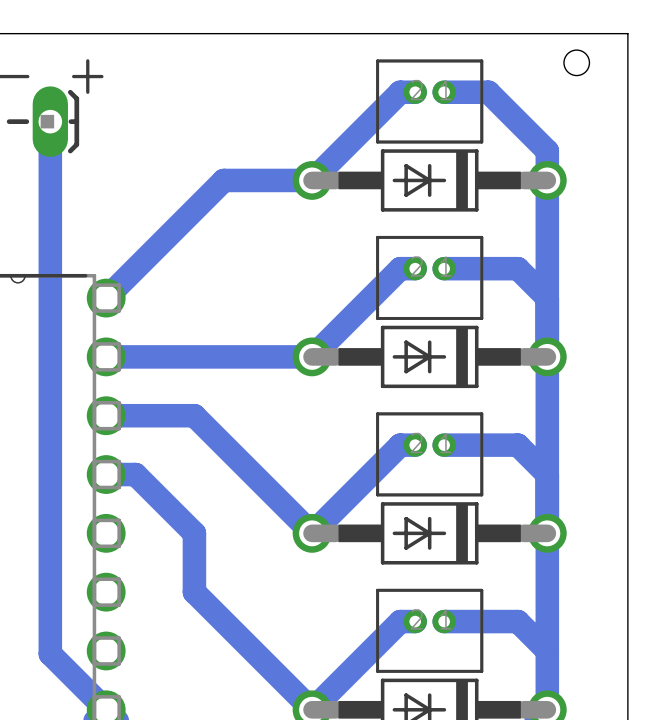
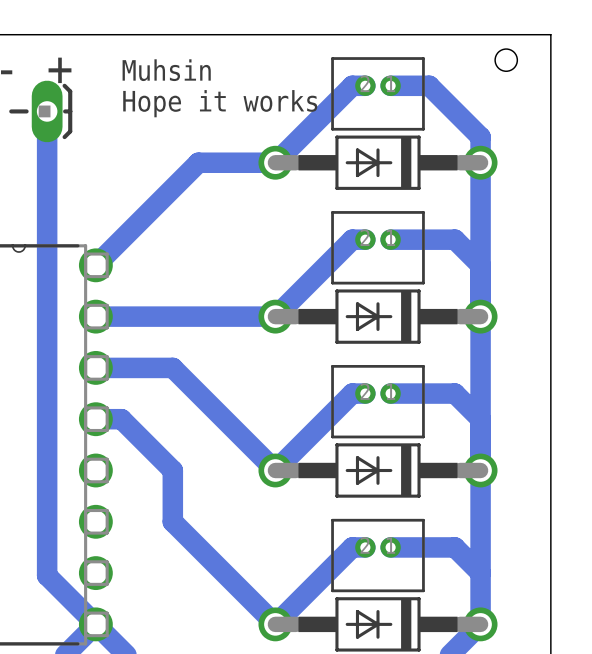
text: none -> Muhsin (166, 70)
text: none -> Hope it works (220, 103)

